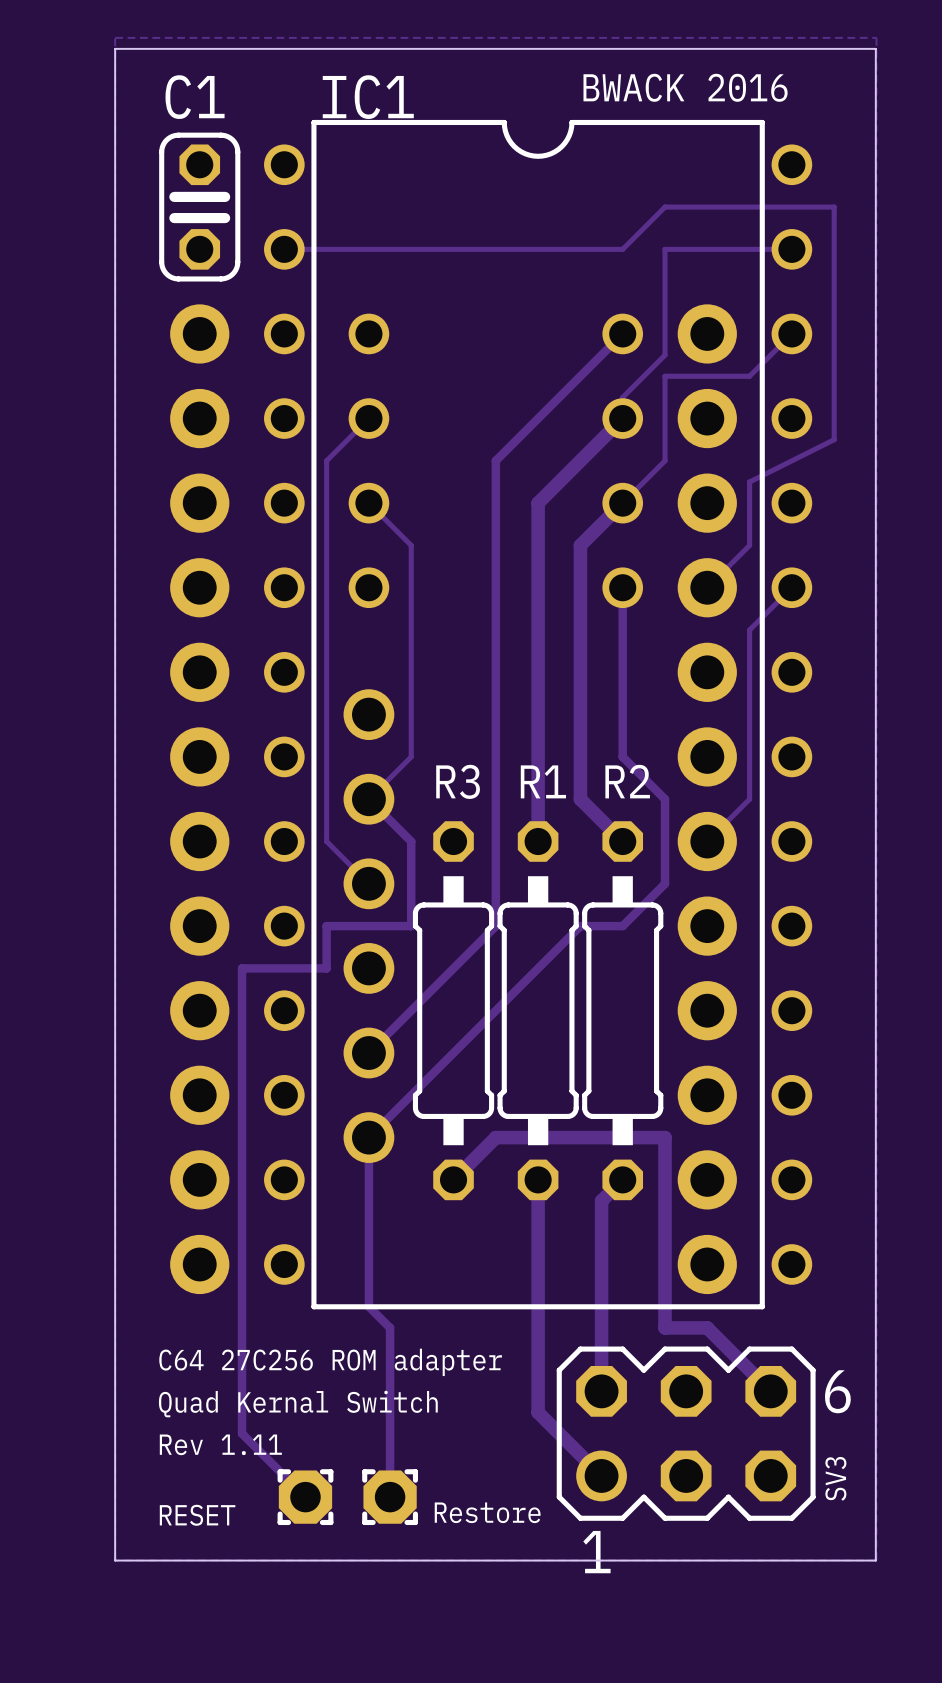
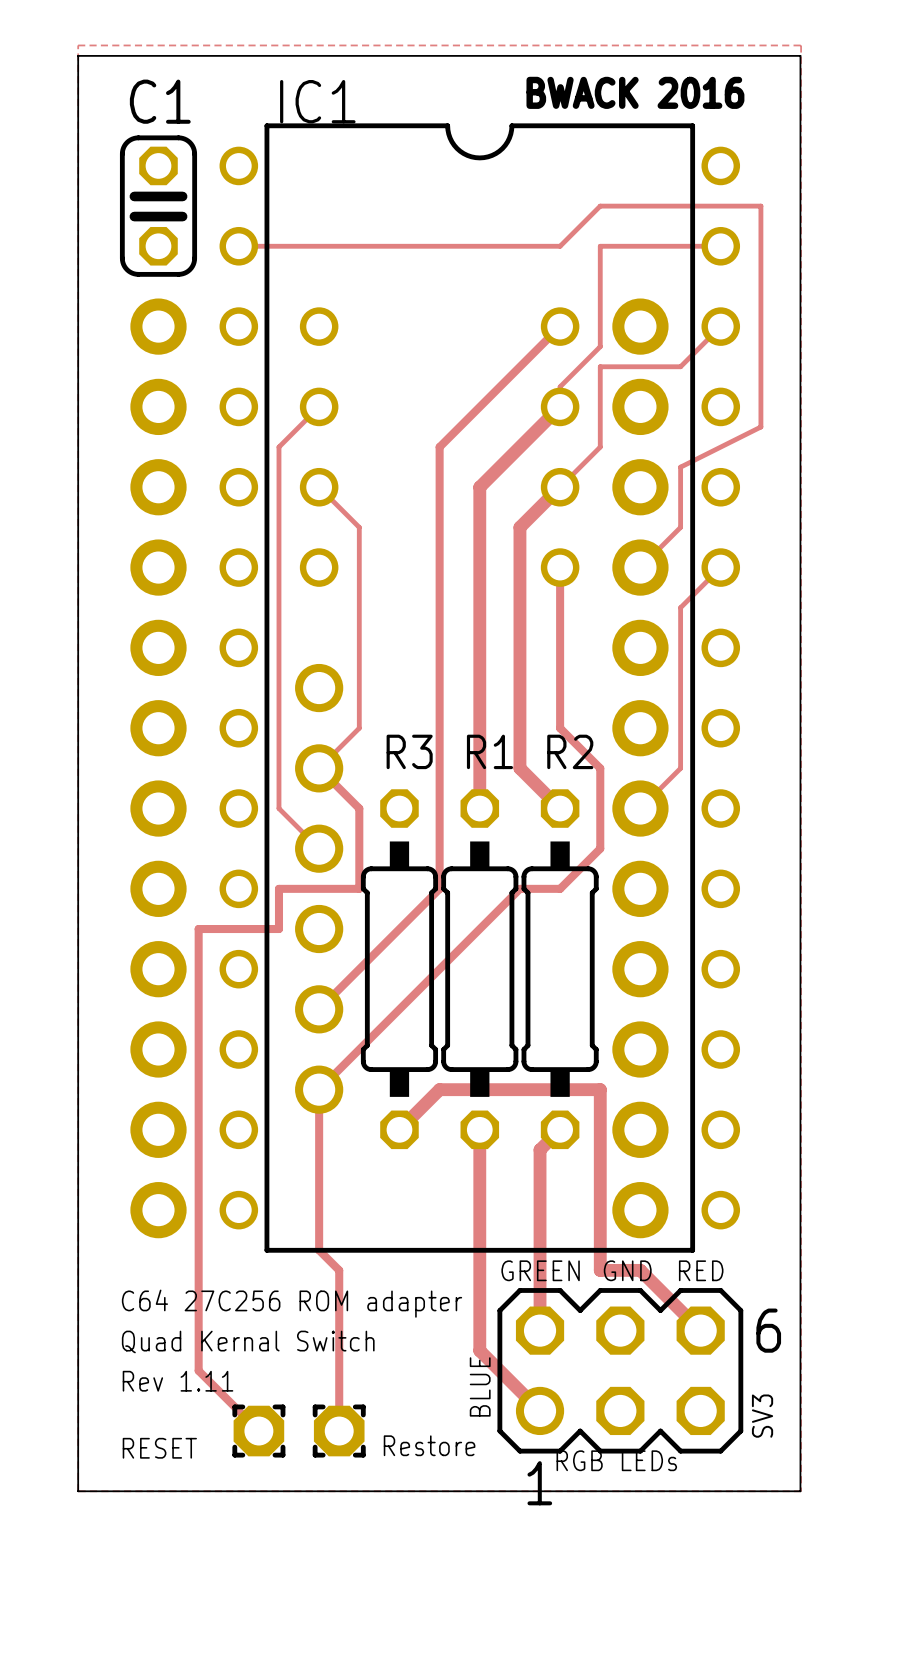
text: none -> GREEN (540, 1270)
text: none -> GND (627, 1270)
text: none -> RED (701, 1270)
text: none -> BLUE (480, 1386)
text: none -> RGB LEDs (616, 1460)

